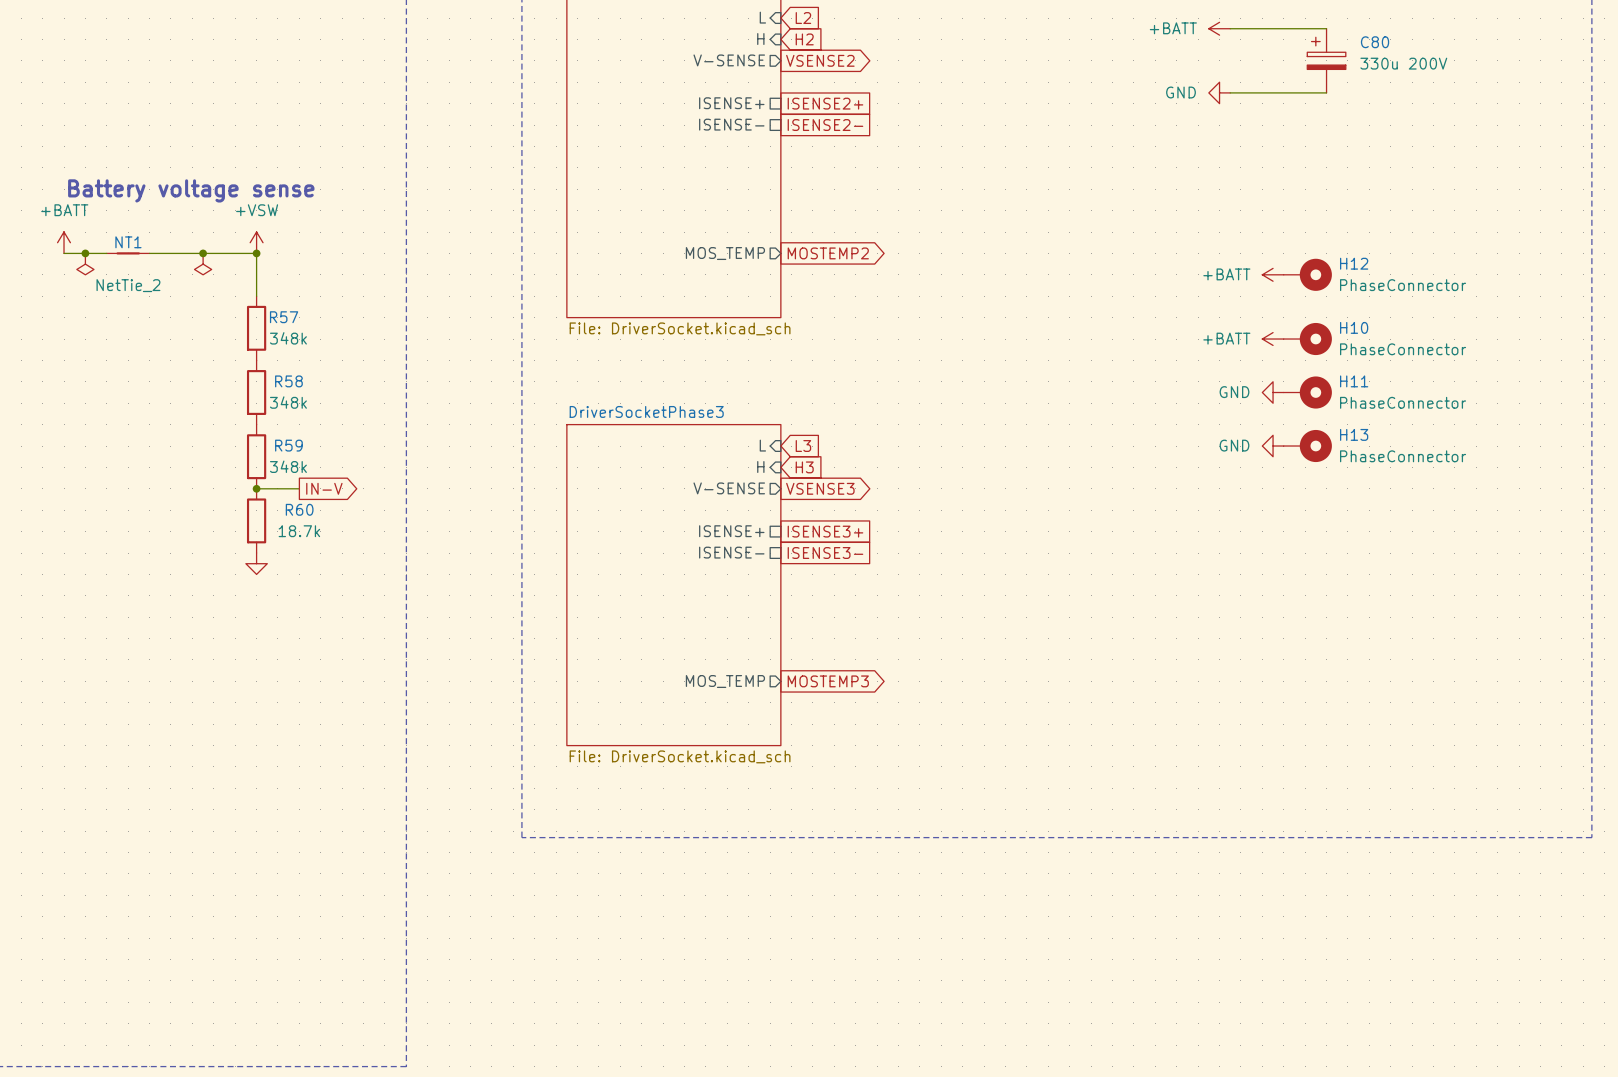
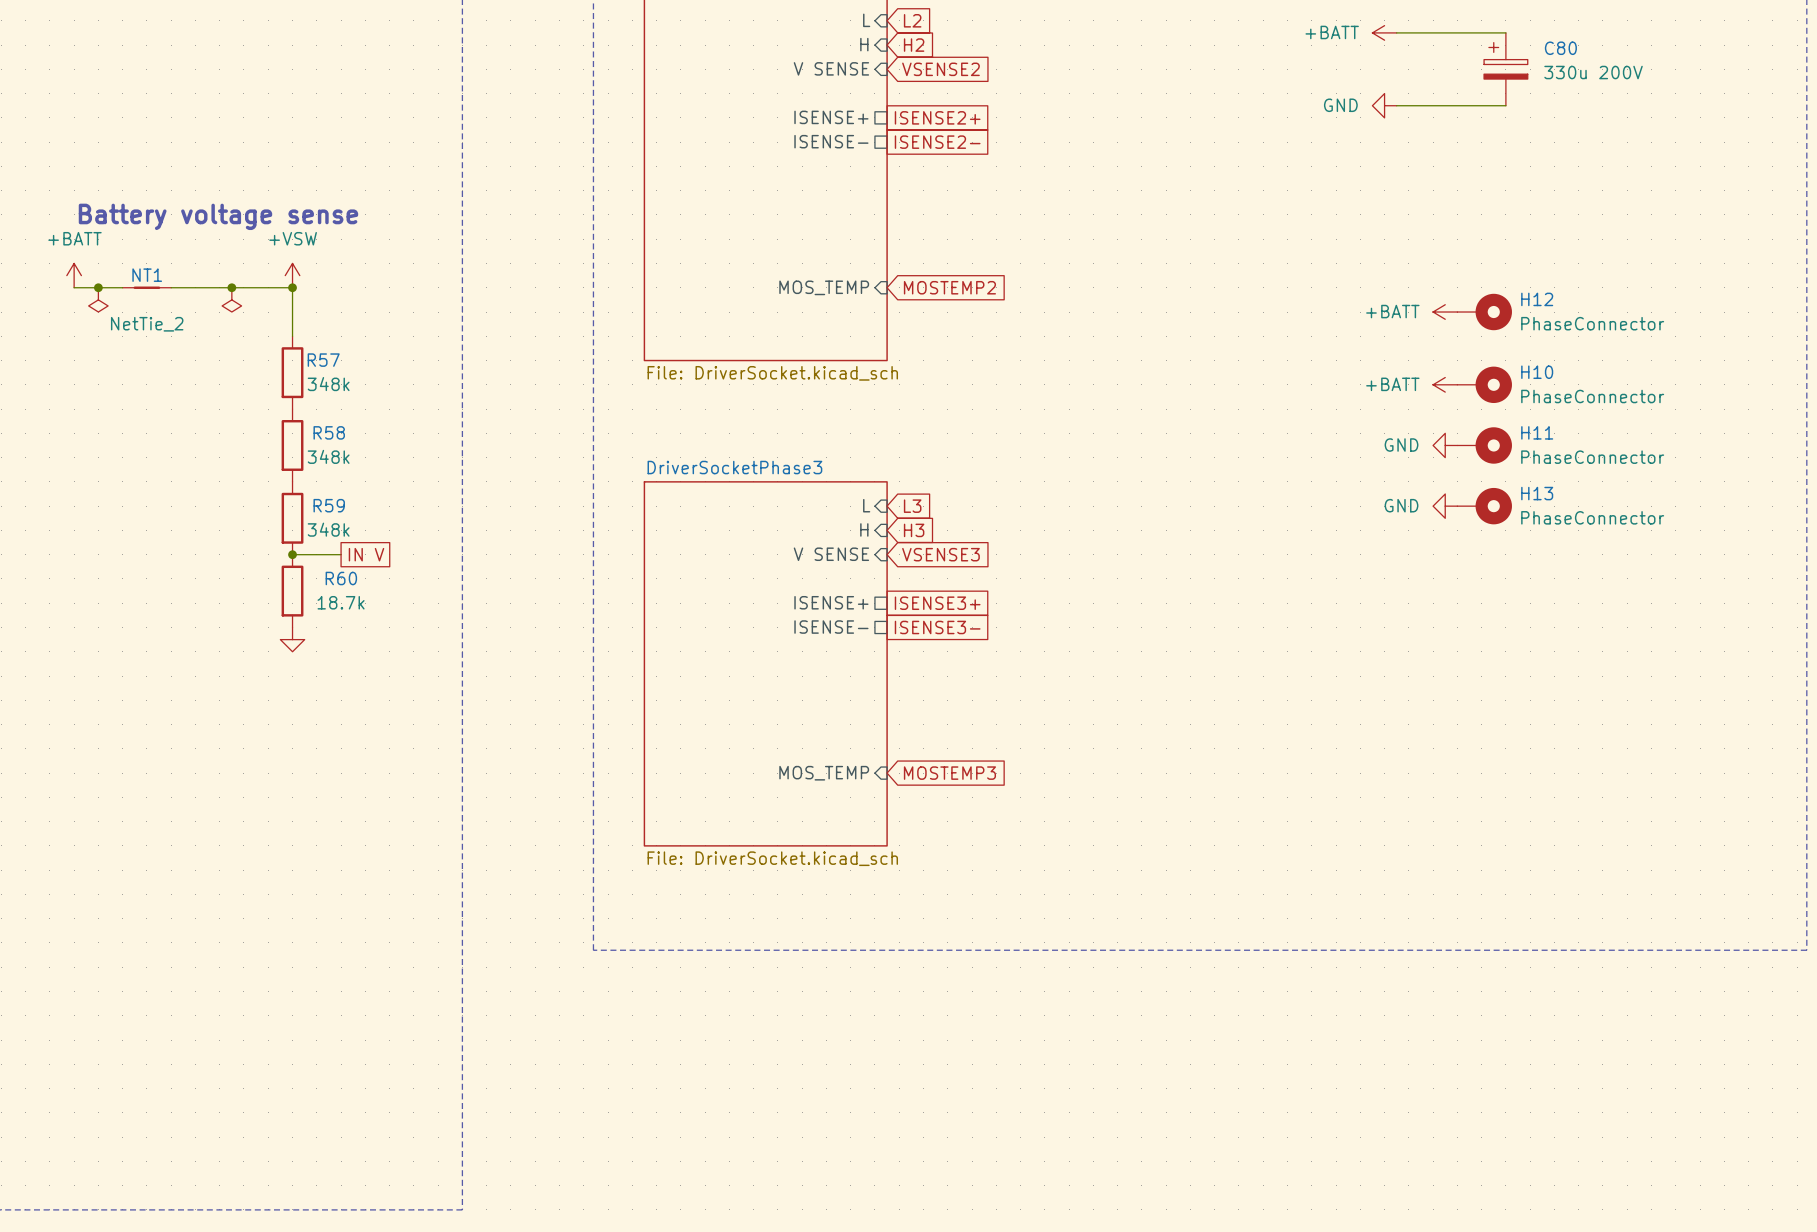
sheet pin shape: output (729, 60) -> input (831, 68)
sheet pin: V-SENSE (729, 60) -> V SENSE (831, 68)
global label shape: output (820, 60) -> input (940, 69)
sheet pin shape: output (725, 253) -> input (824, 287)
global label shape: output (828, 253) -> input (949, 287)
global label shape: output (324, 488) -> passive (366, 554)
global label: IN-V (324, 488) -> IN V (366, 554)
sheet pin shape: output (729, 488) -> input (831, 554)
sheet pin: V-SENSE (729, 488) -> V SENSE (831, 554)
global label shape: output (820, 488) -> input (940, 554)
sheet pin shape: output (725, 681) -> input (824, 773)
global label shape: output (828, 681) -> input (949, 773)

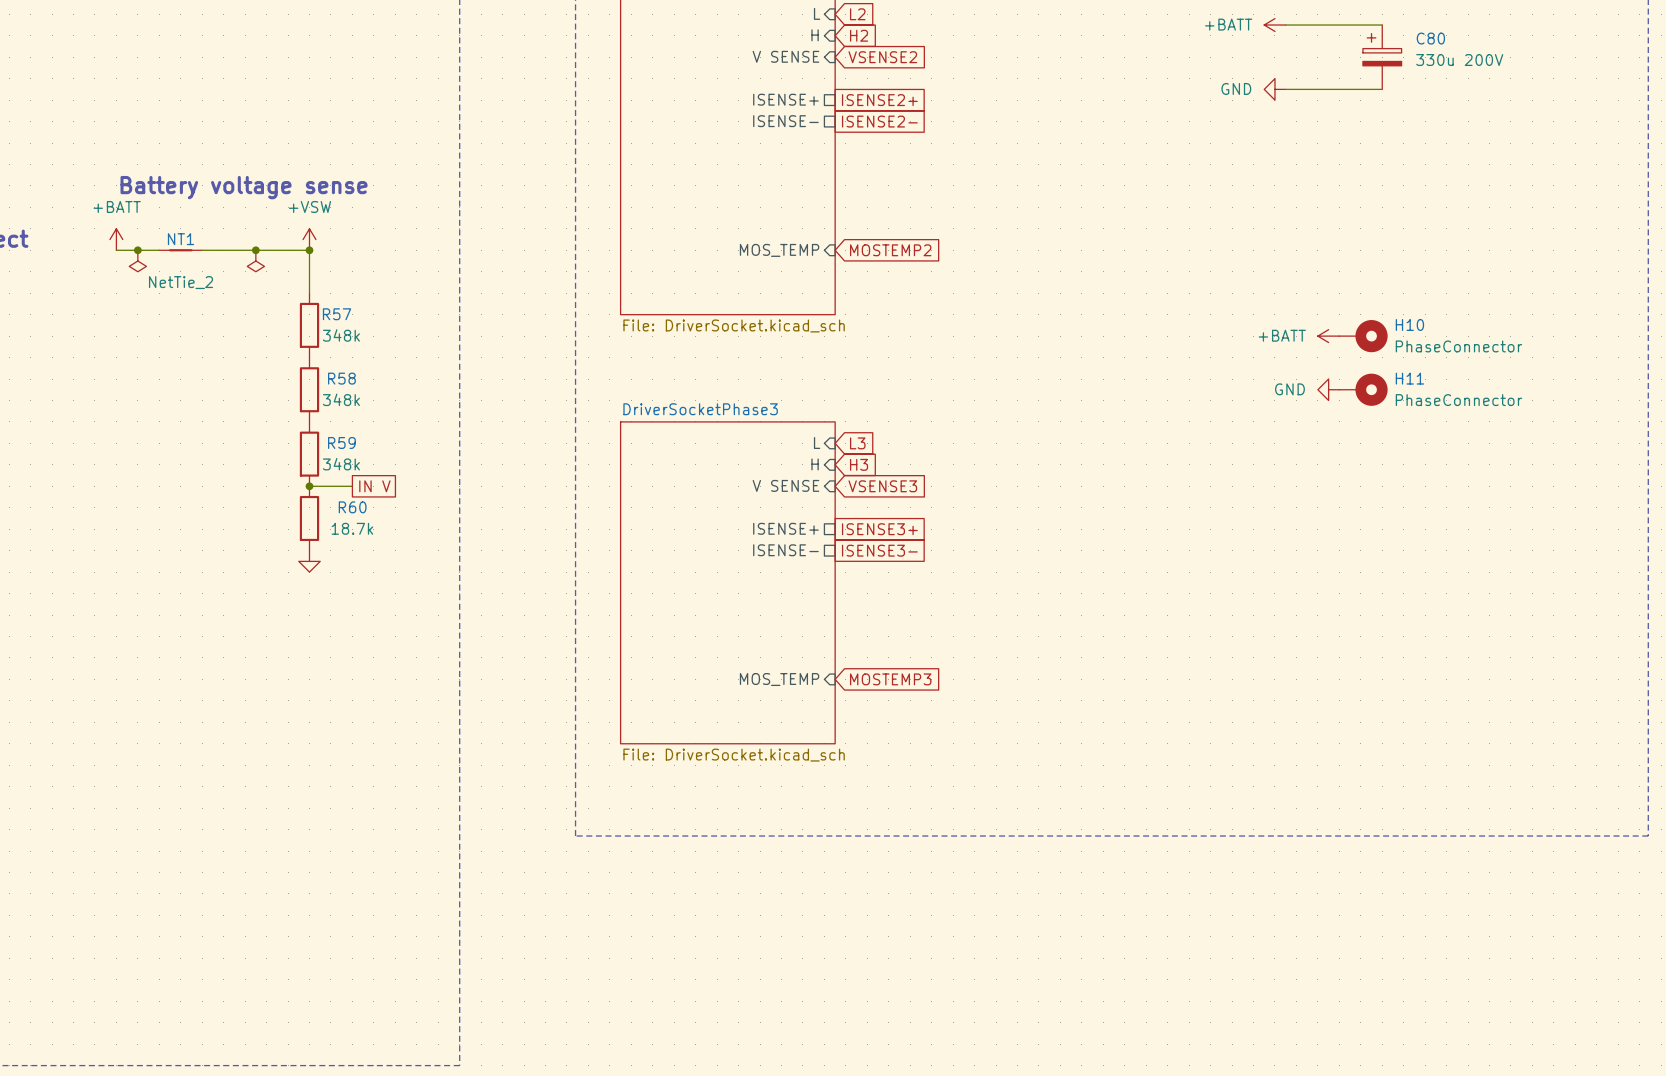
power symbol: +BATT (1445, 312) -> none
H12: PhaseConnector (1484, 312) -> none
power symbol: GND (1445, 506) -> none
H13: PhaseConnector (1484, 506) -> none

